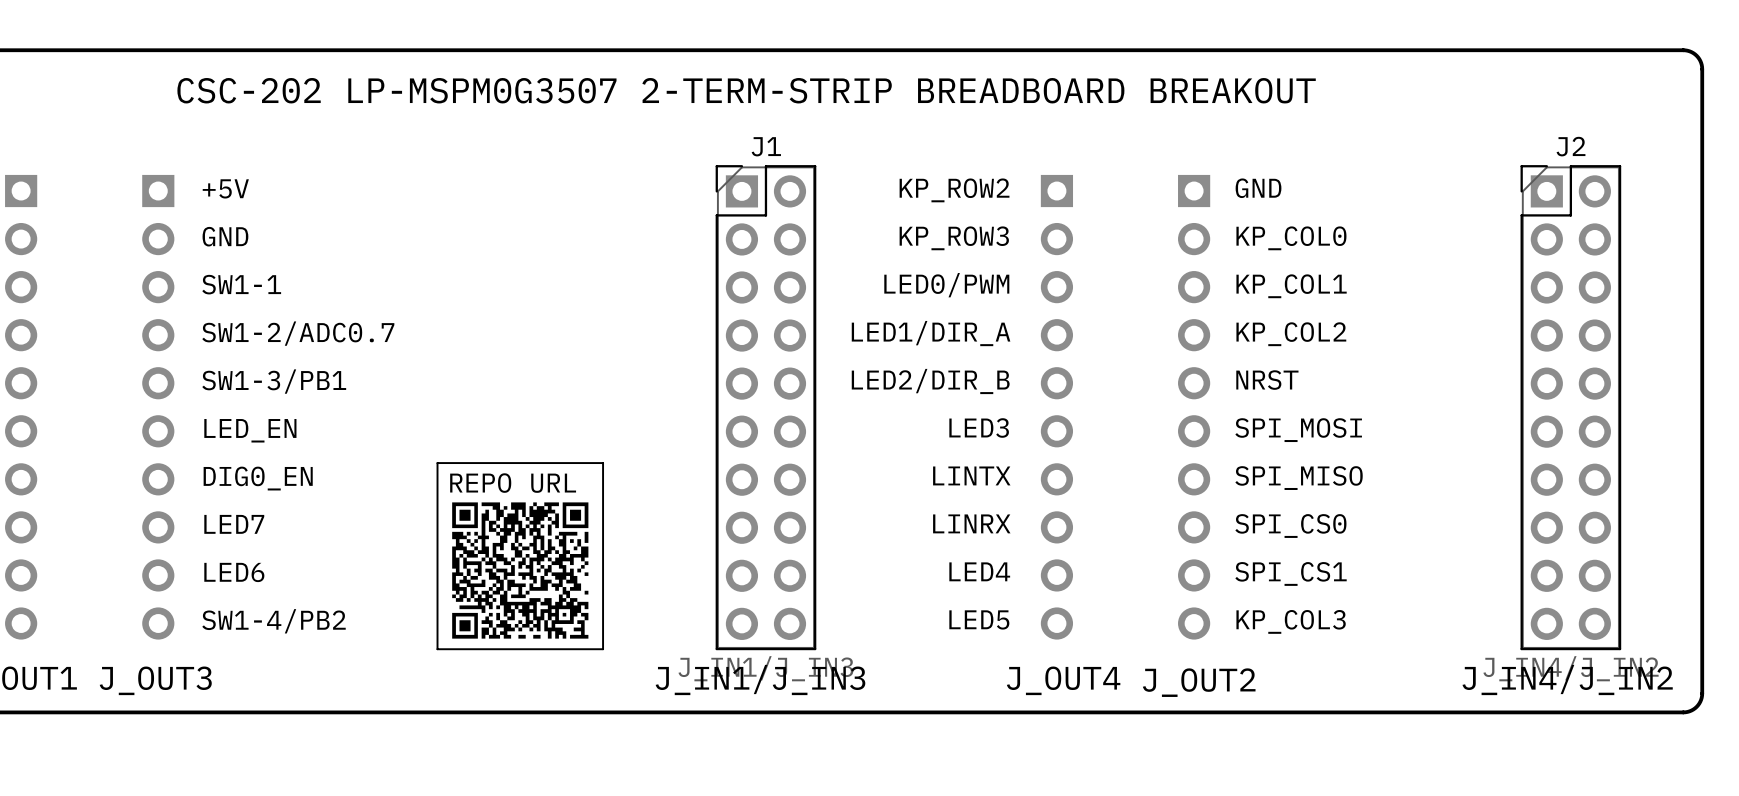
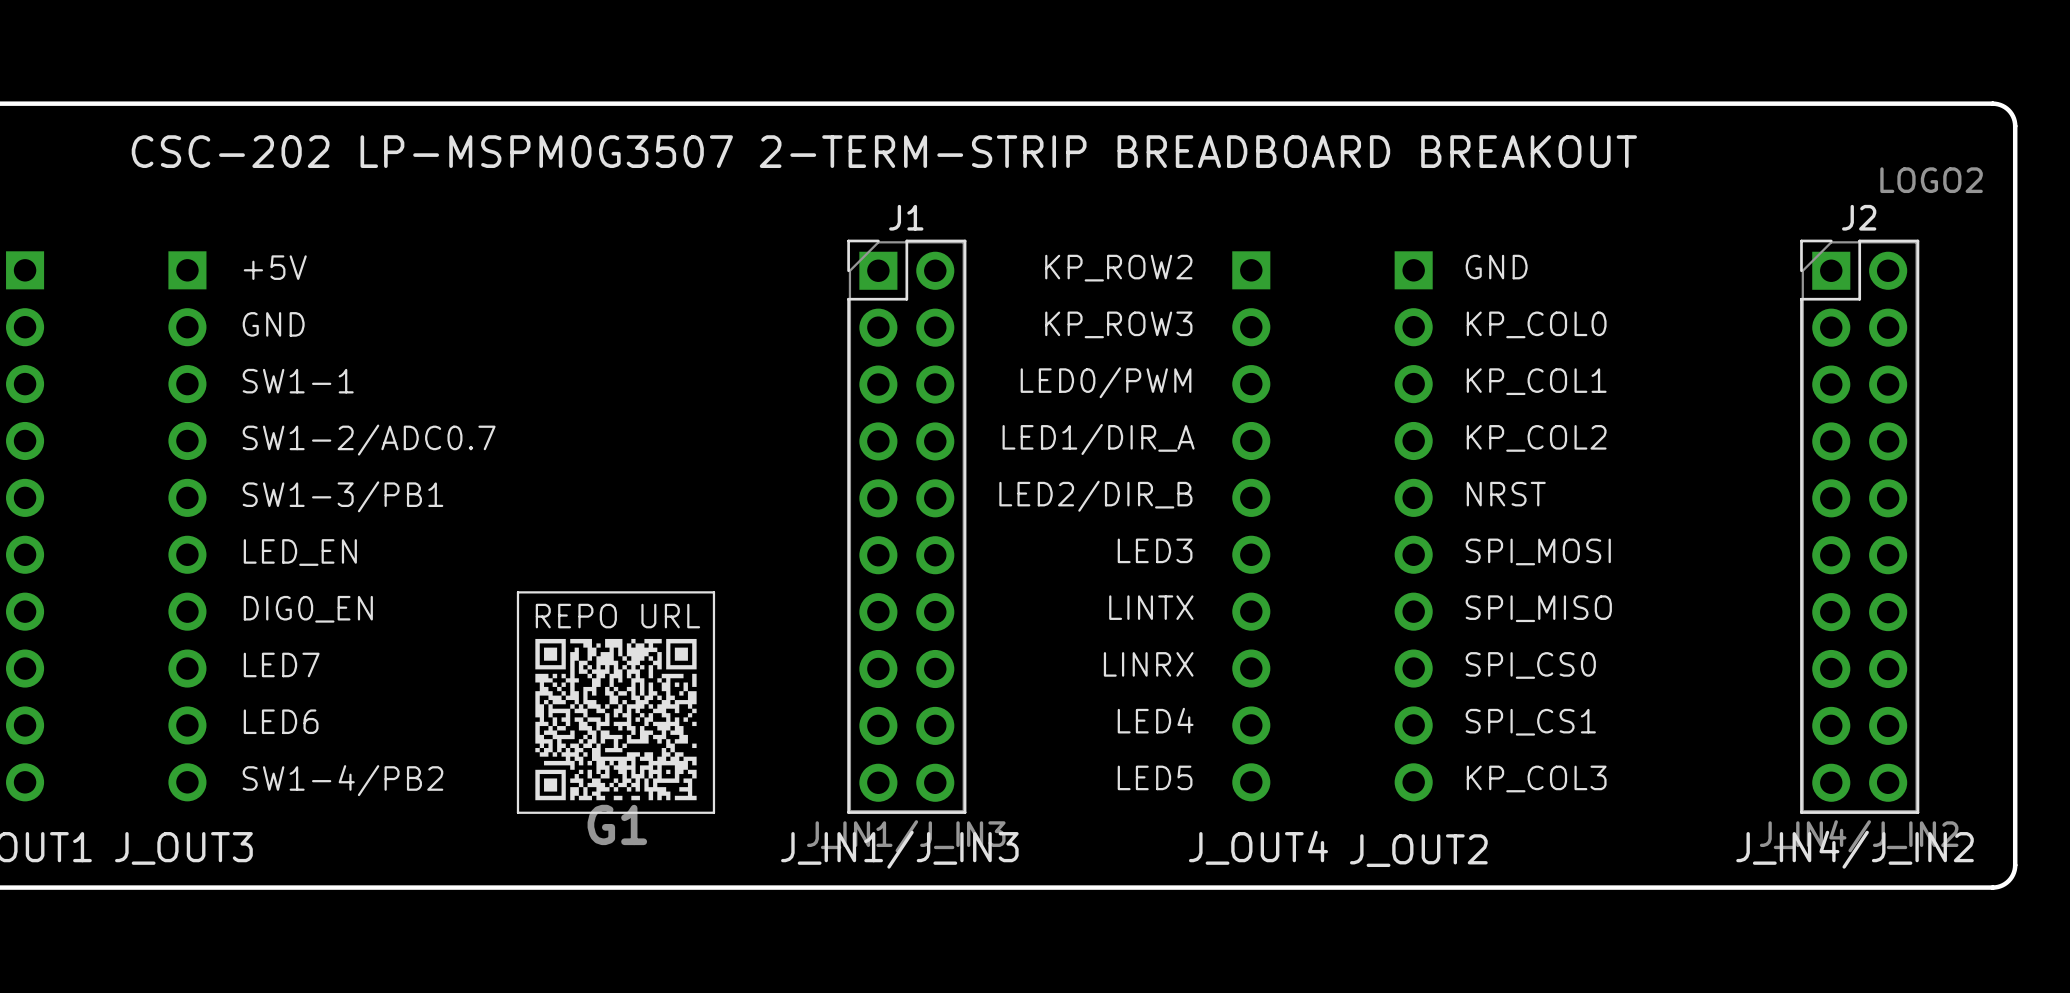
LOGO2: none -> (1931, 180)
G1: none -> (615, 719)

